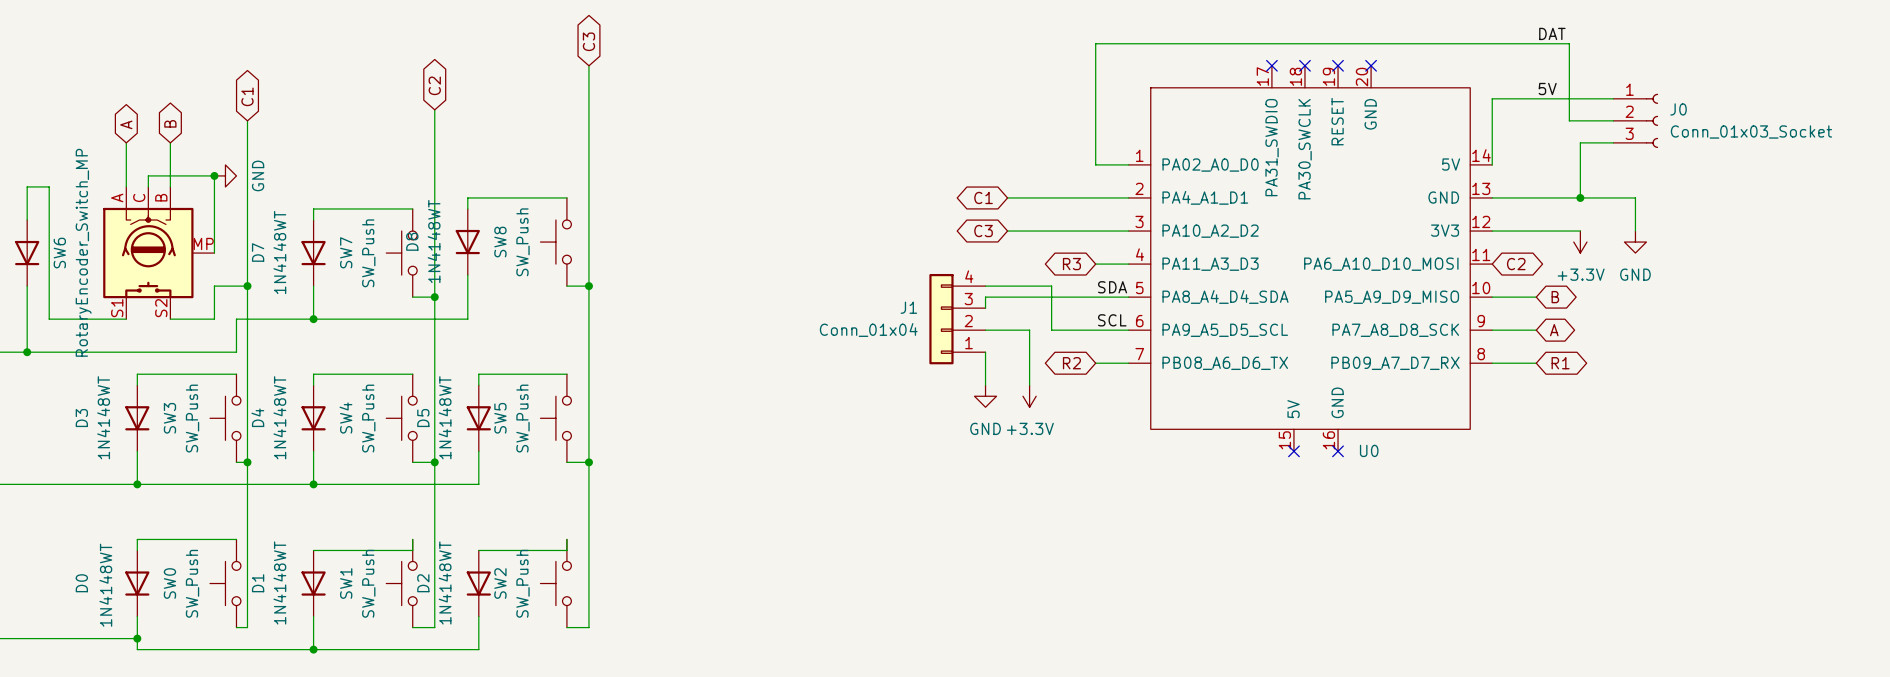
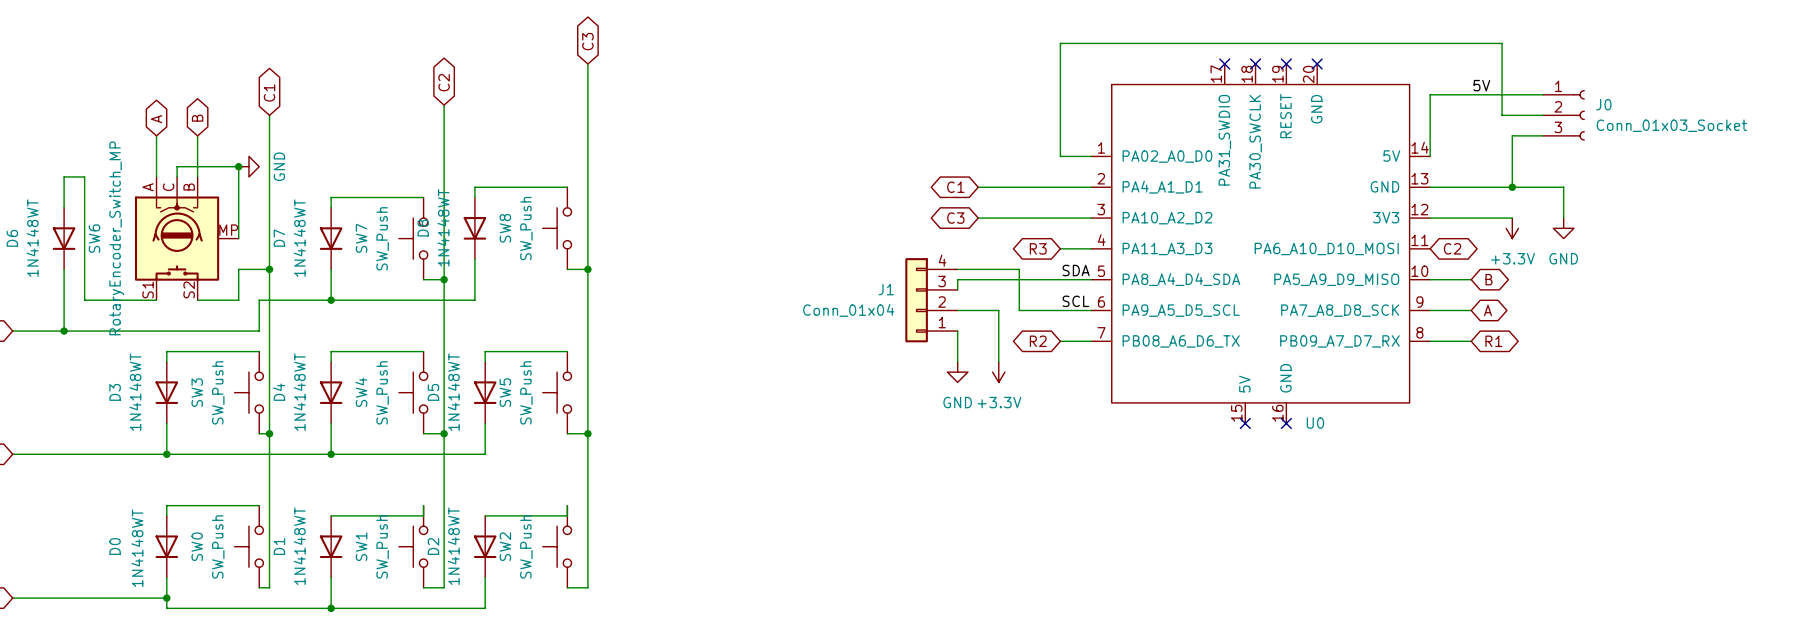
label: DAT (1552, 33) -> none

